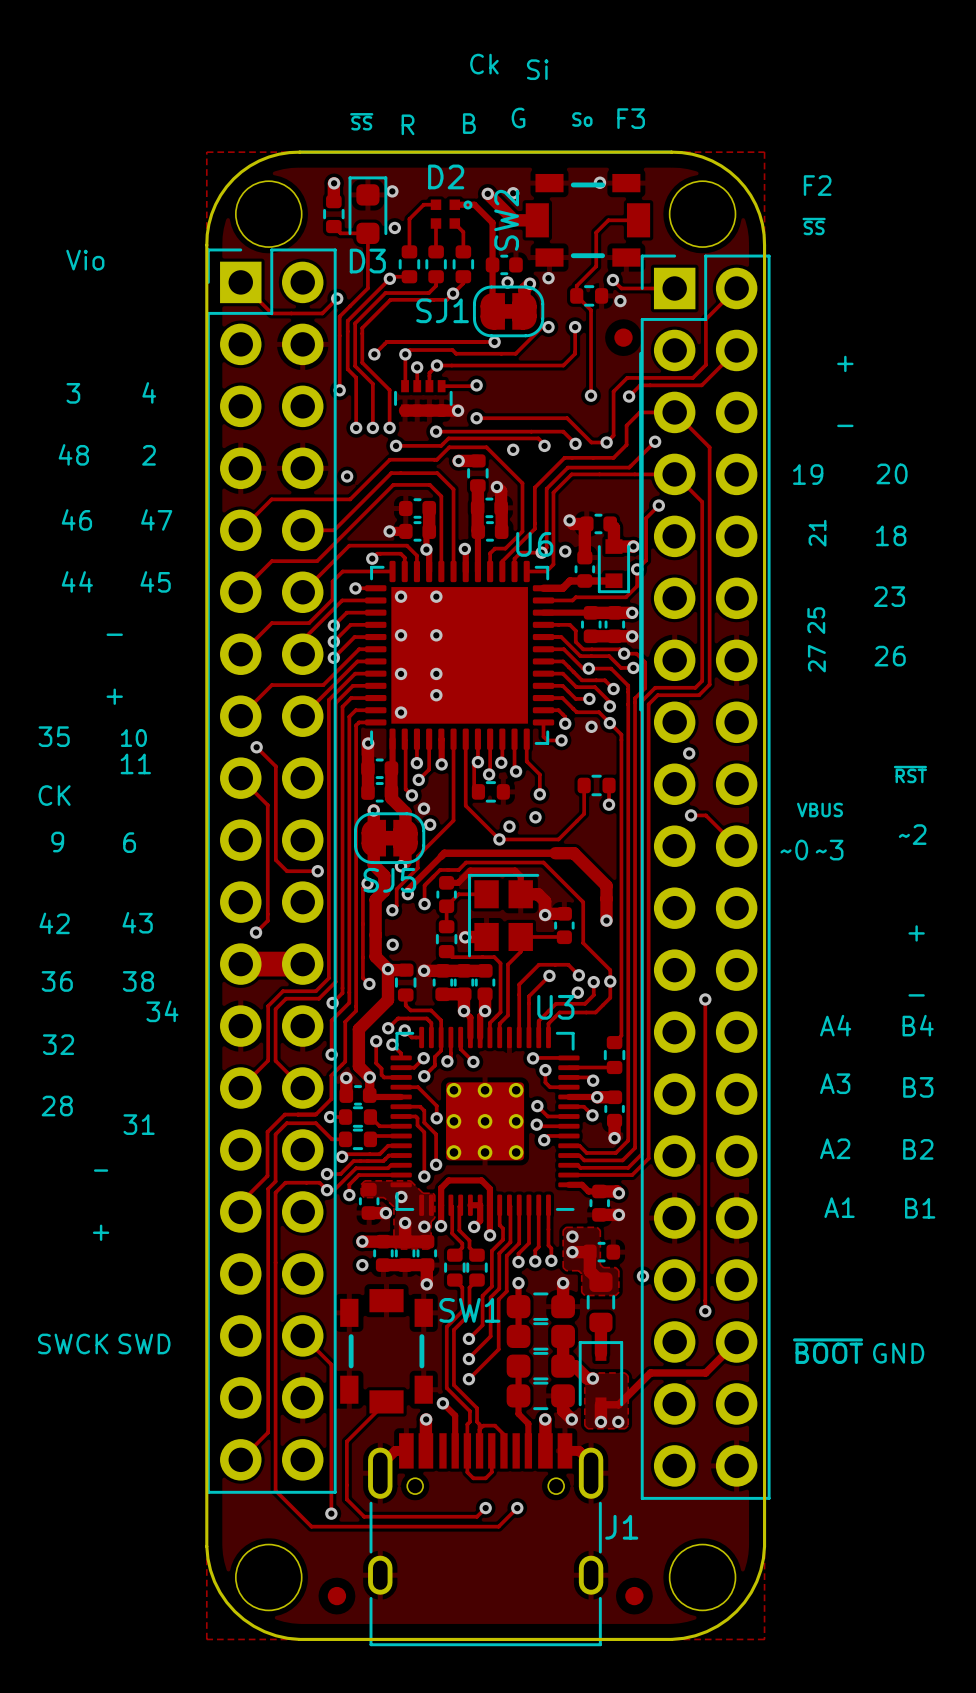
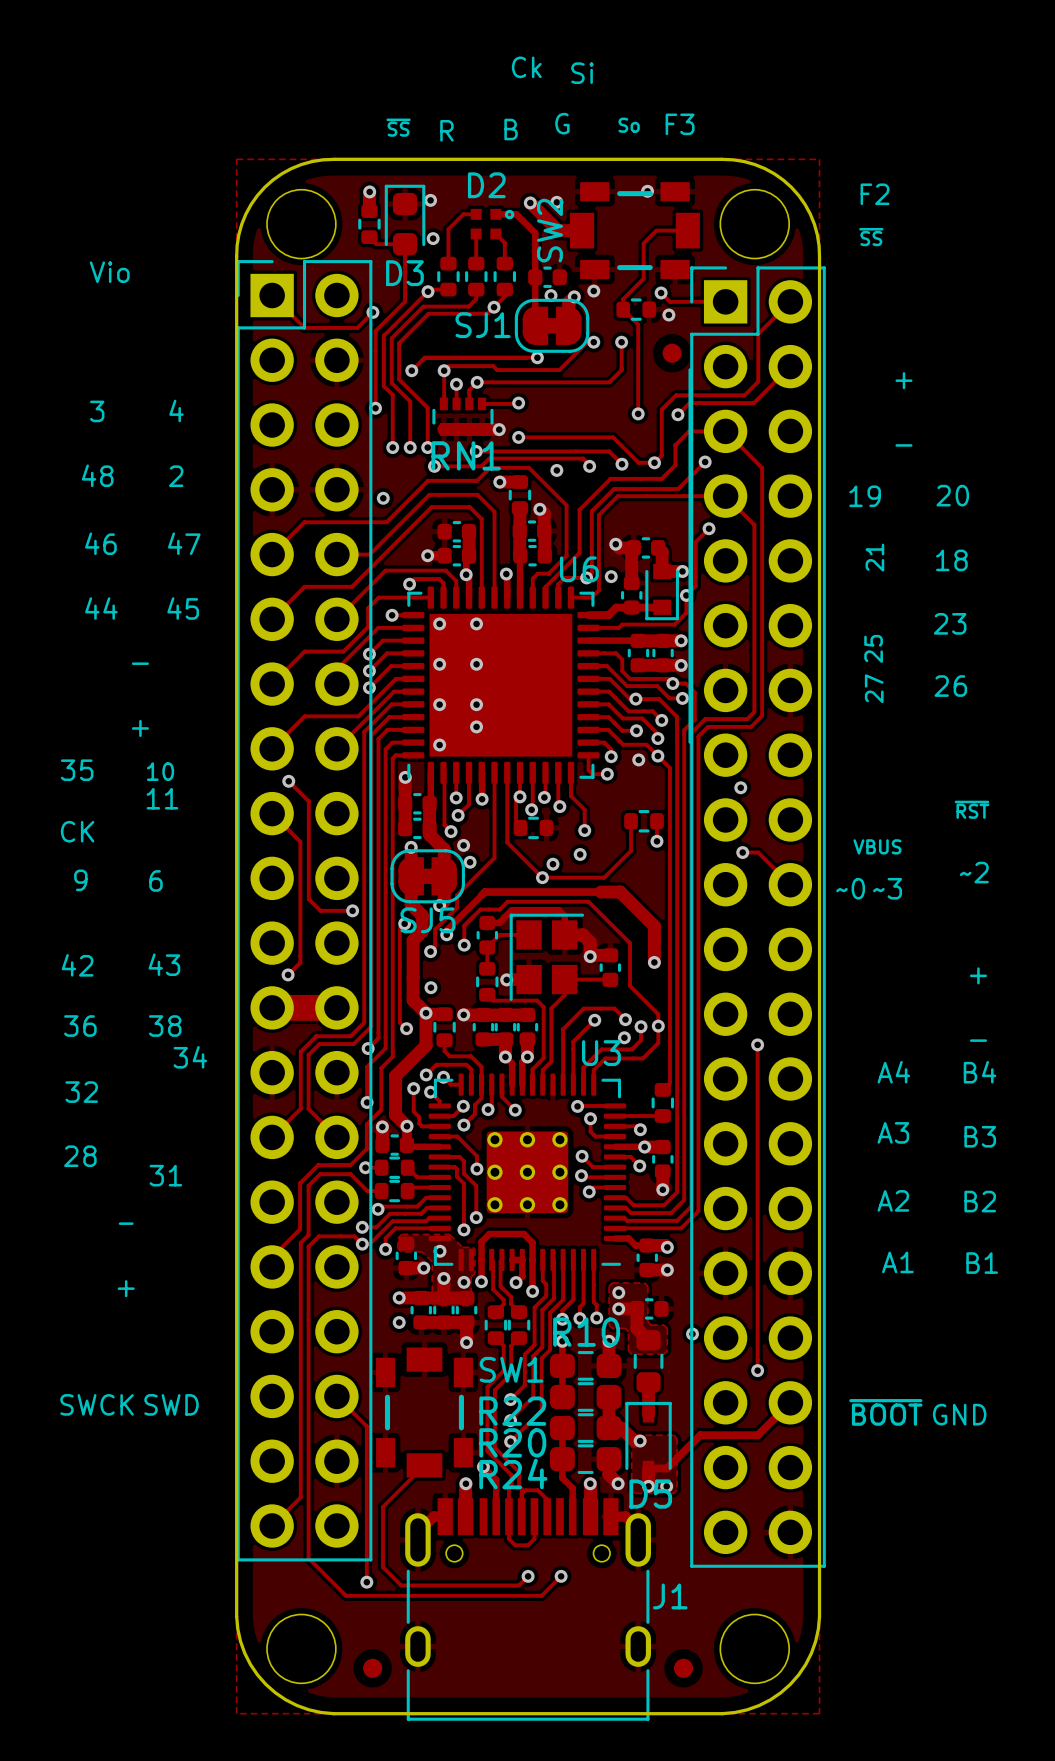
RN1 name: none -> RN1 (466, 455)
R10 name: none -> R10 (586, 1332)
R22 name: none -> R22 (512, 1411)
R20 name: none -> R20 (512, 1442)
R24 name: none -> R24 (513, 1473)
D5 name: none -> D5 (650, 1494)

